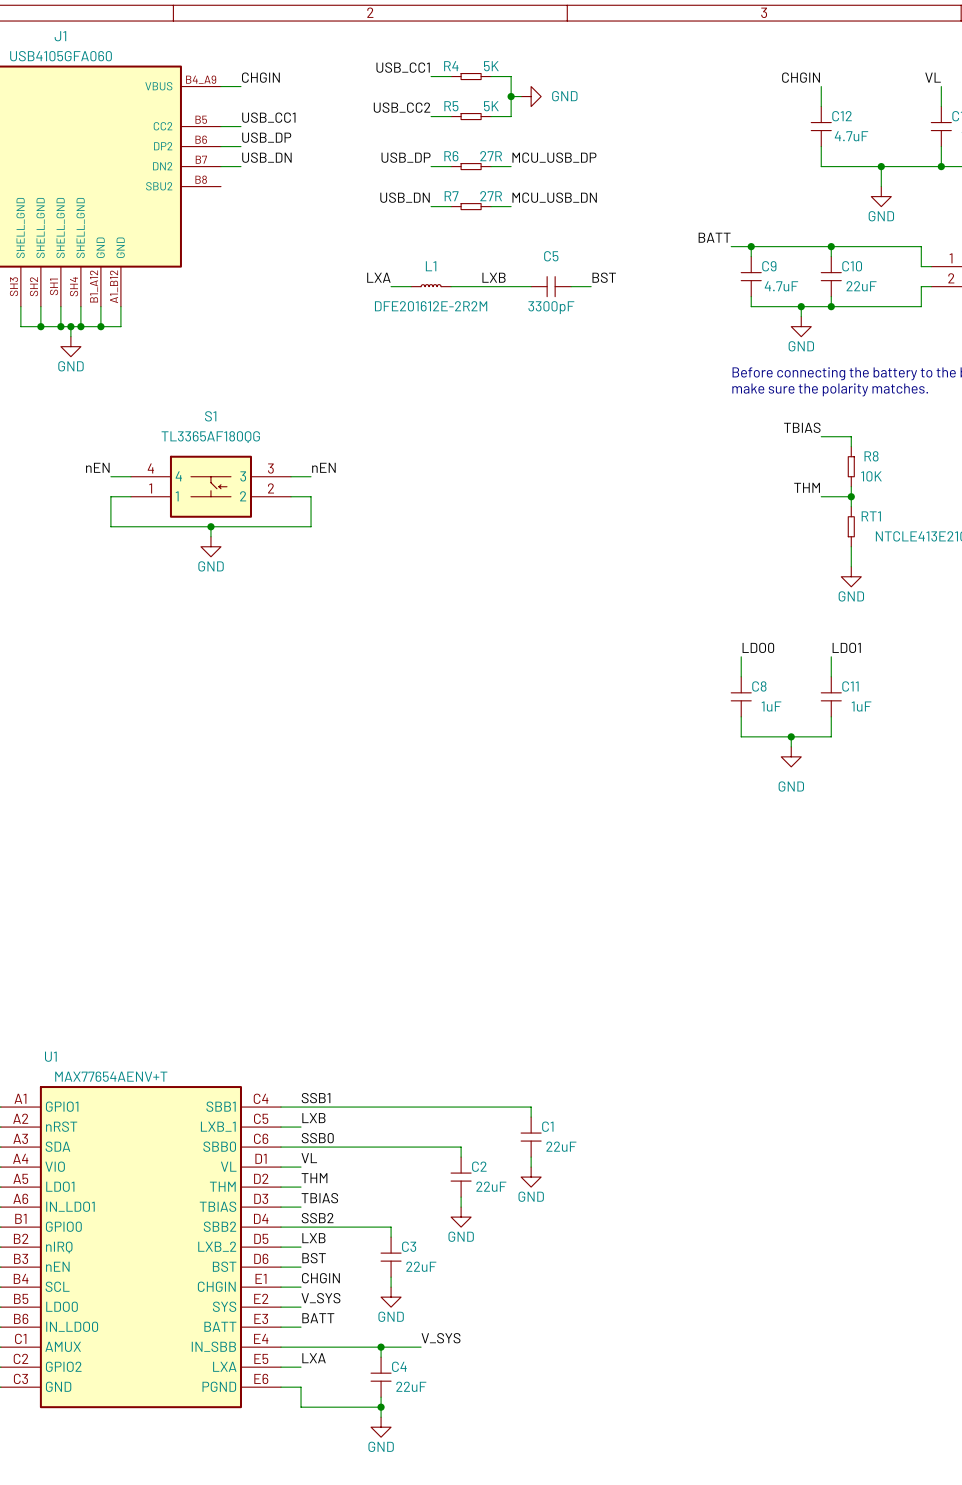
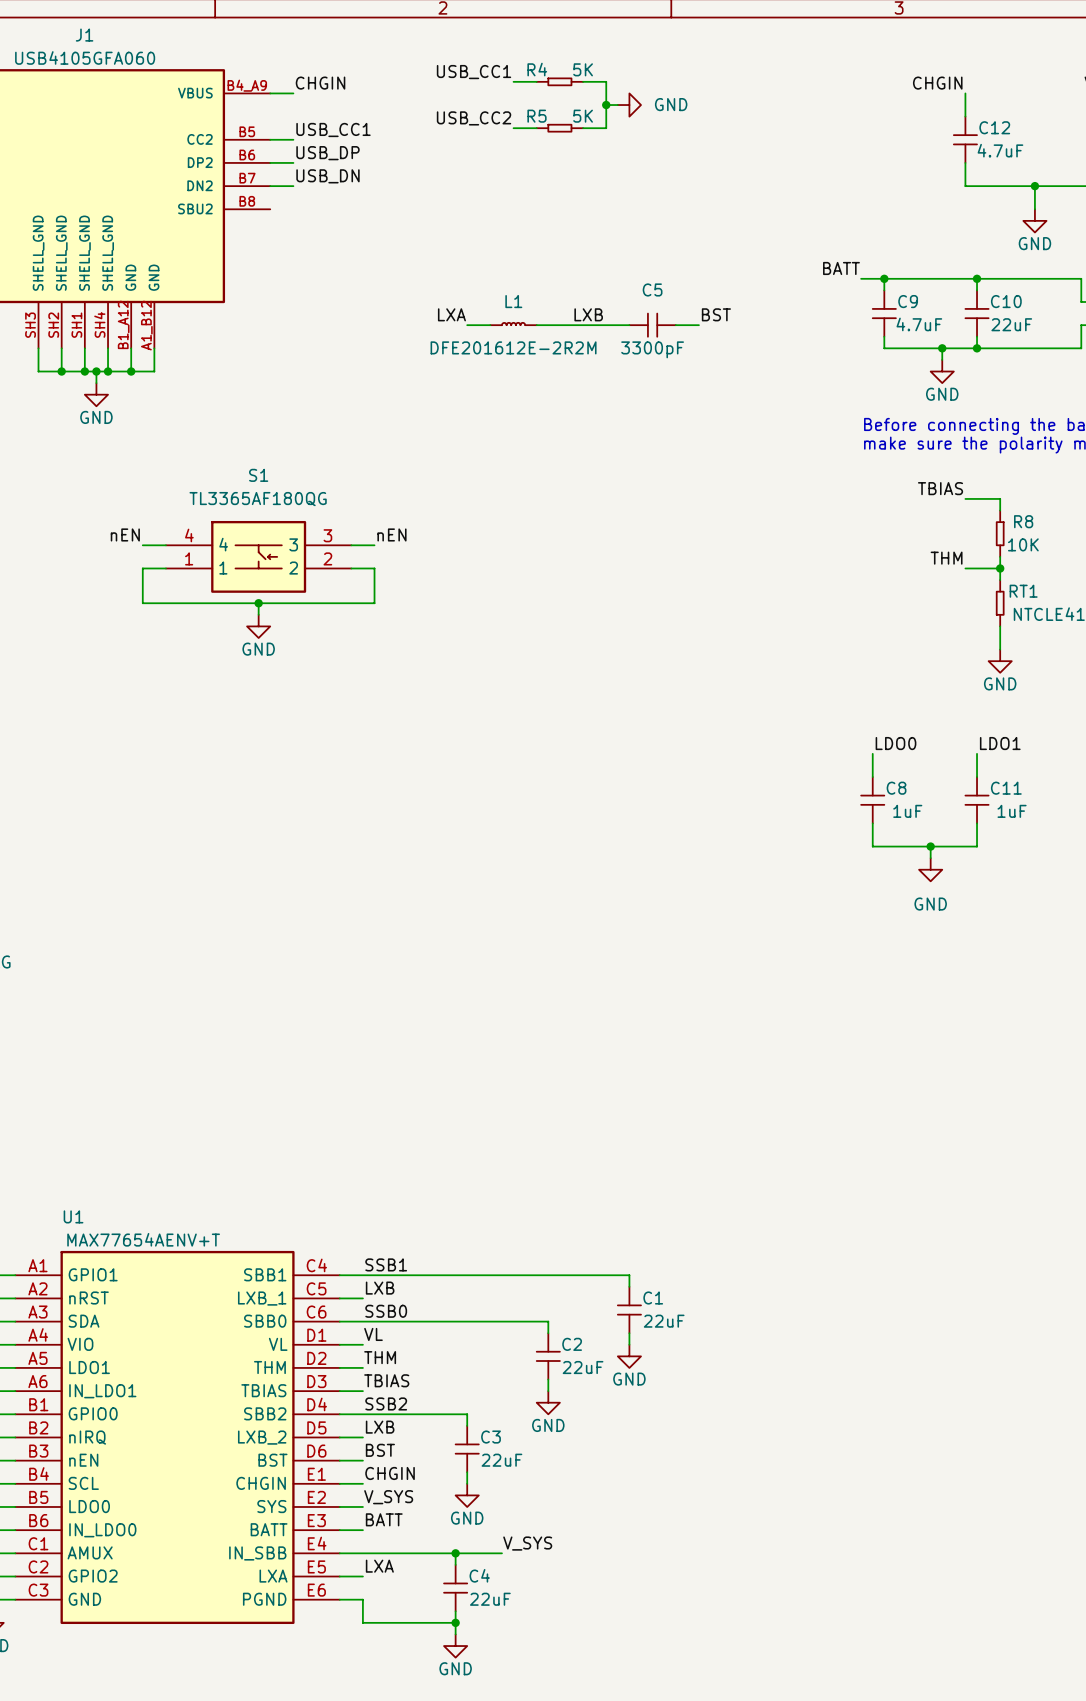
label: USB_DP (406, 157) -> none
label: MCU_USB_DP (554, 157) -> none
wire: (431, 166) (451, 166) -> none
R6: 27R (471, 166) -> none
wire: (491, 166) (511, 166) -> none
label: USB_DN (405, 197) -> none
label: MCU_USB_DN (554, 197) -> none
wire: (431, 206) (451, 206) -> none
R7: 27R (471, 206) -> none
wire: (491, 206) (511, 206) -> none

